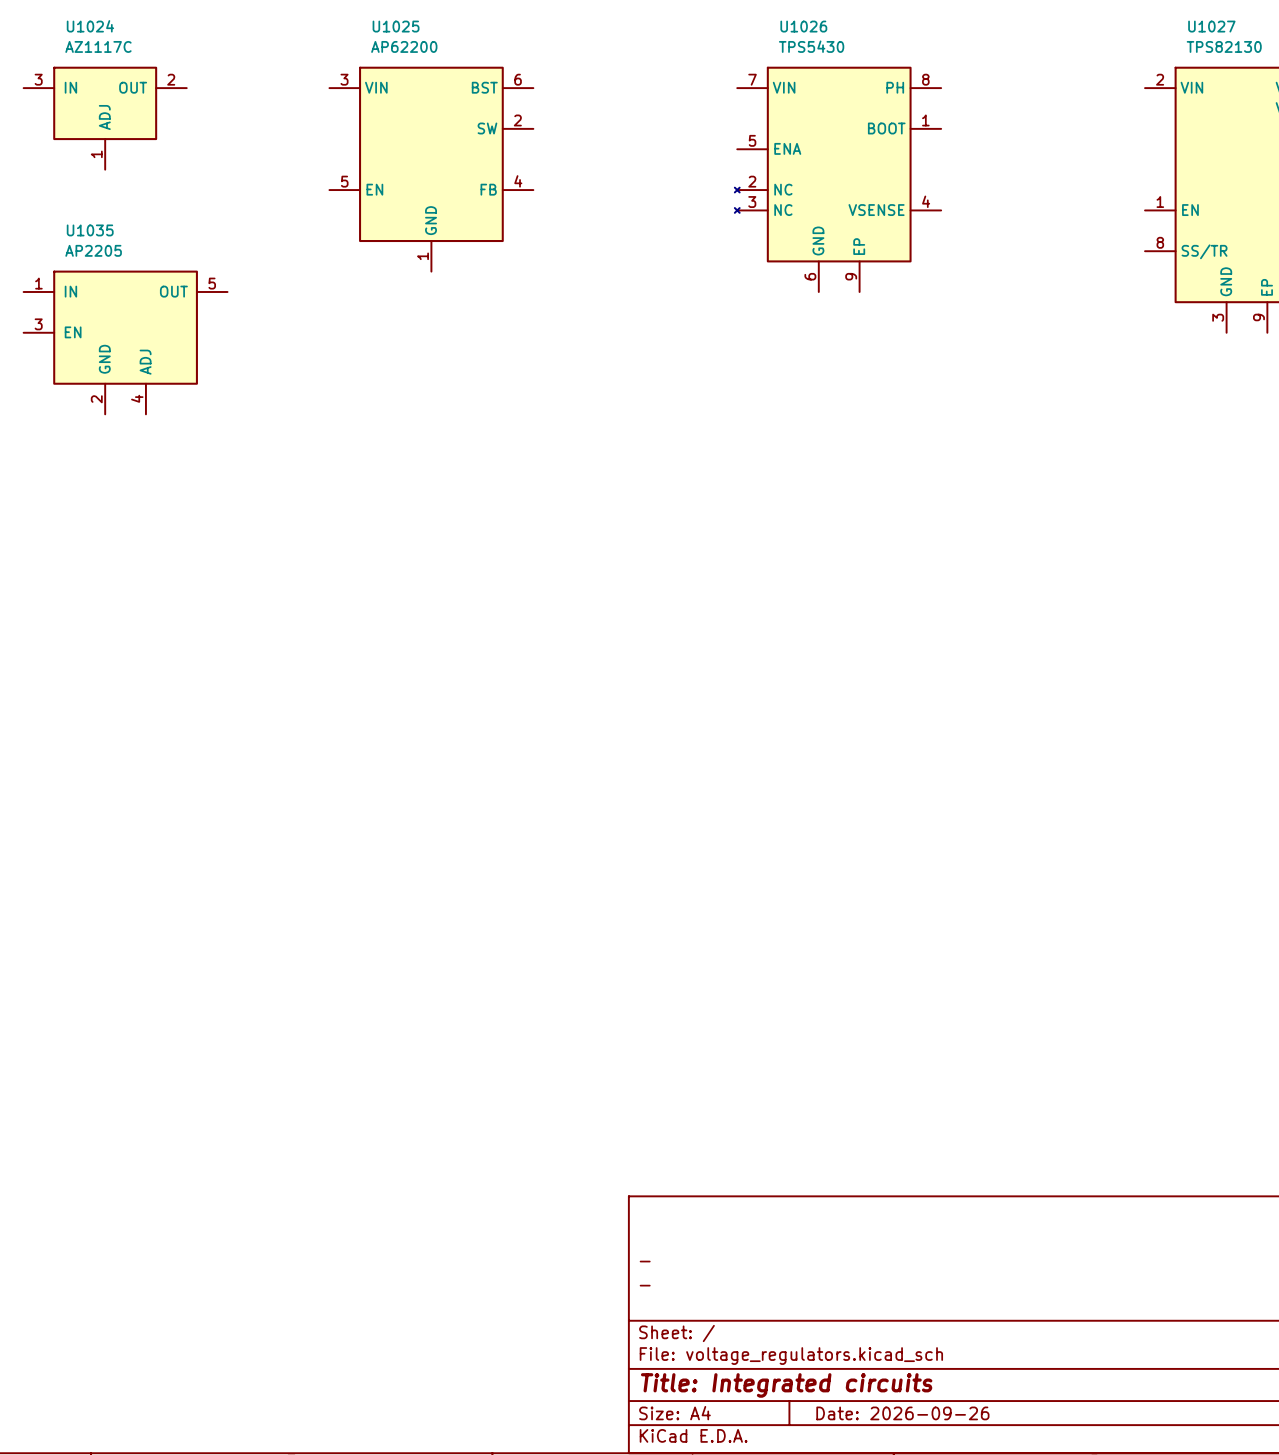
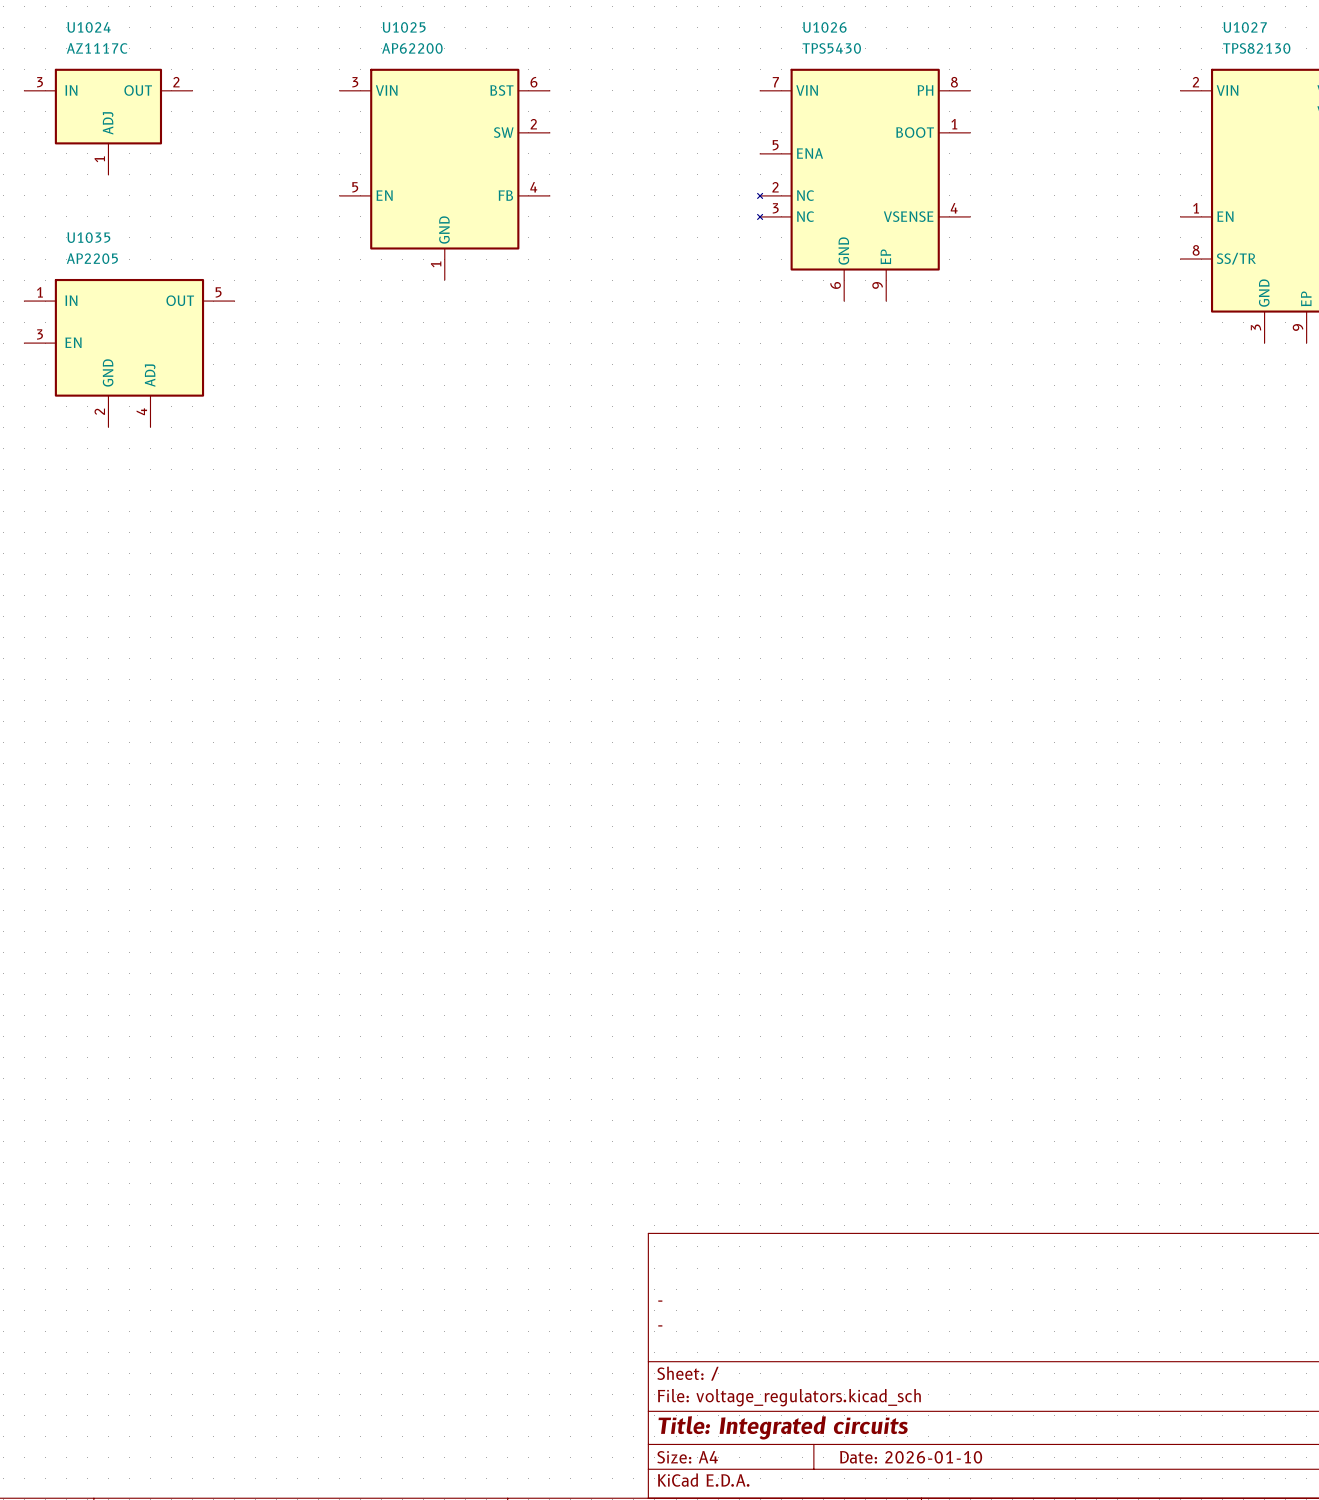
title block: Date: 2026-09-26 (902, 1413) -> Date: 2026-01-10 (911, 1457)

